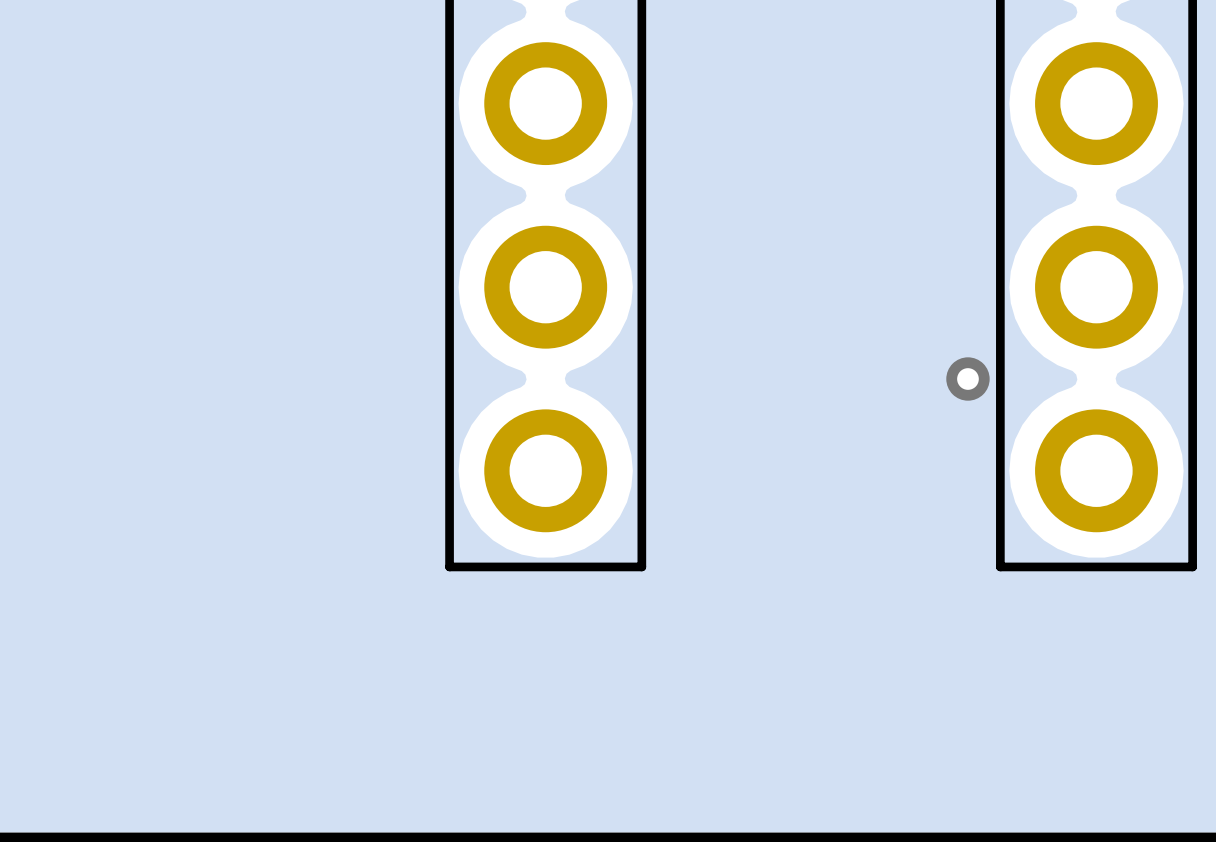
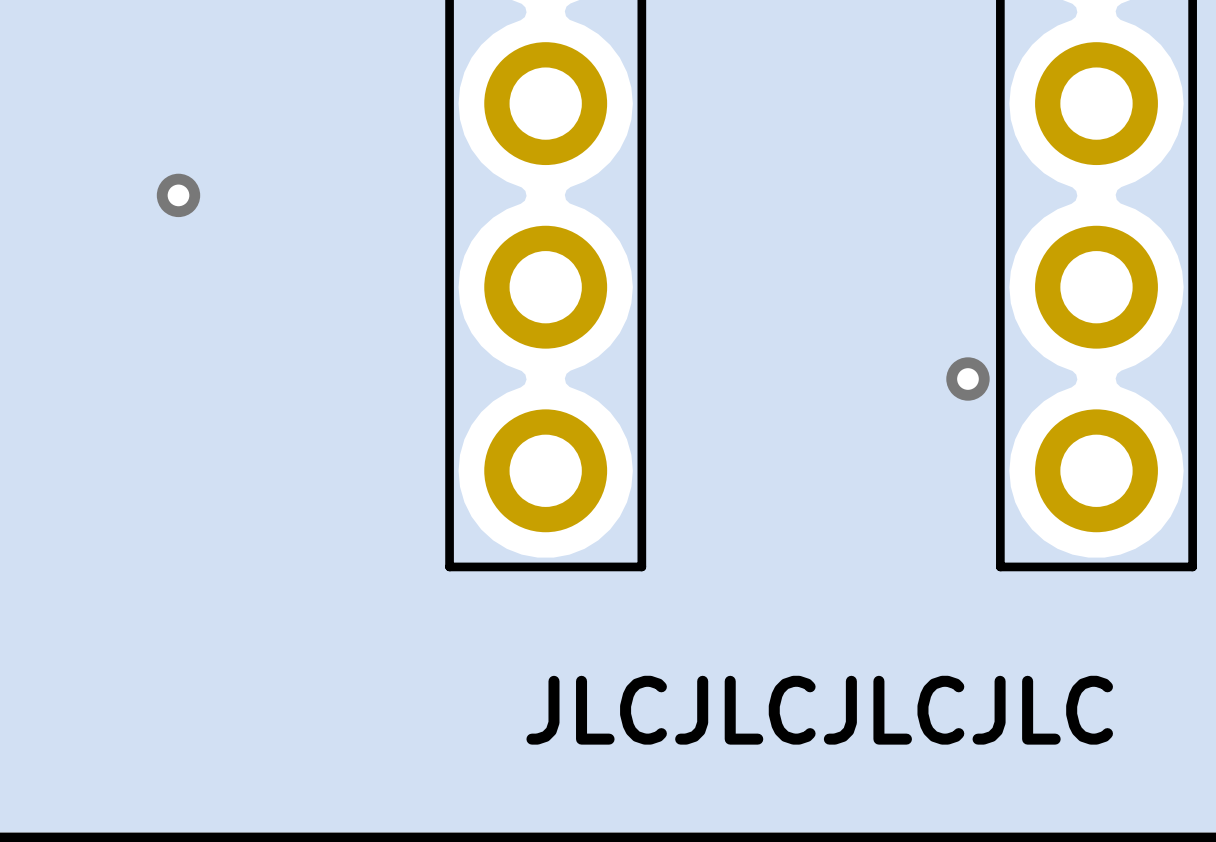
via: none -> (178, 195)
text: none -> JLCJLCJLCJLC (819, 710)

